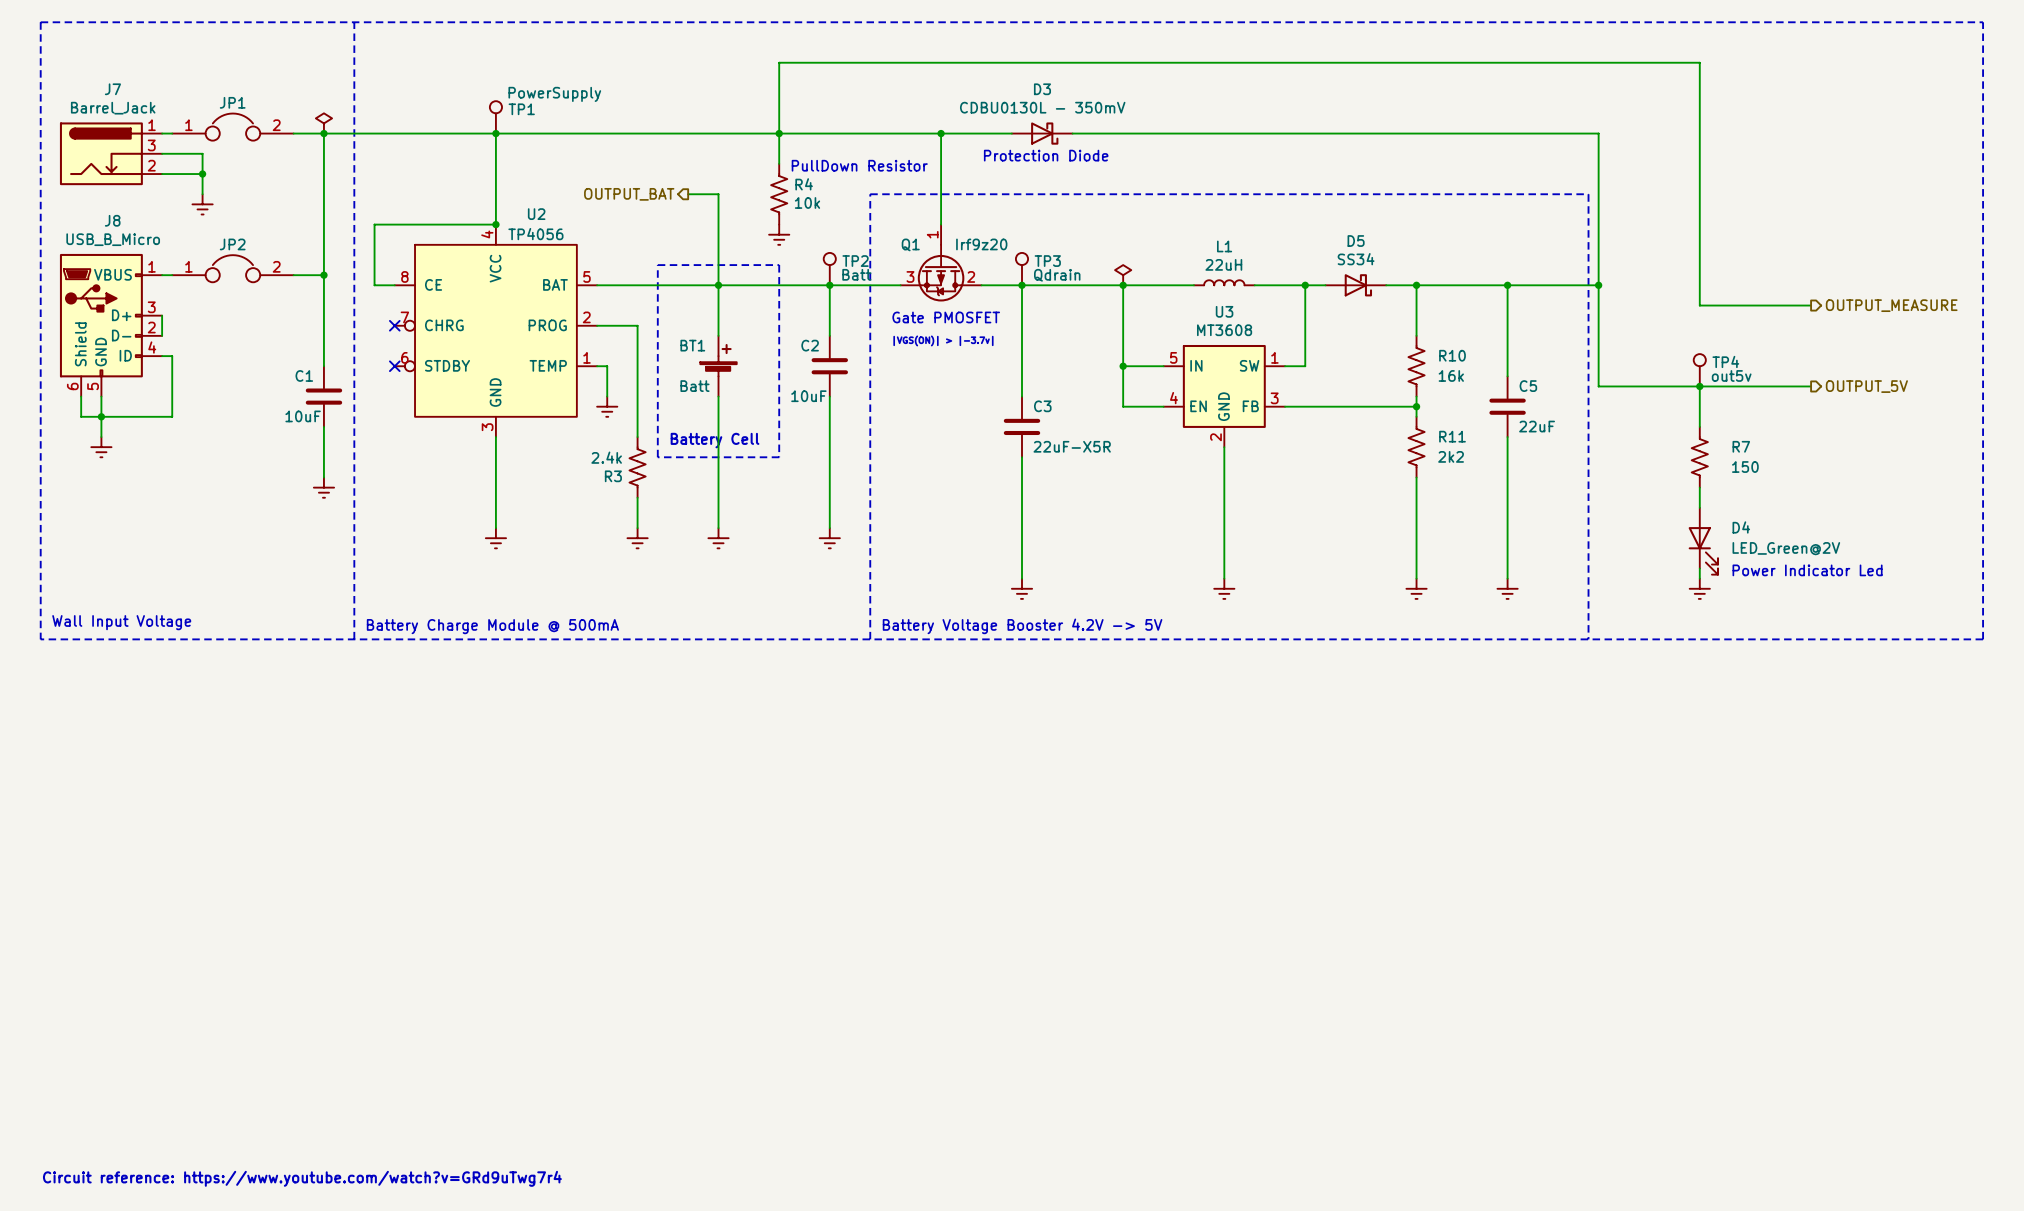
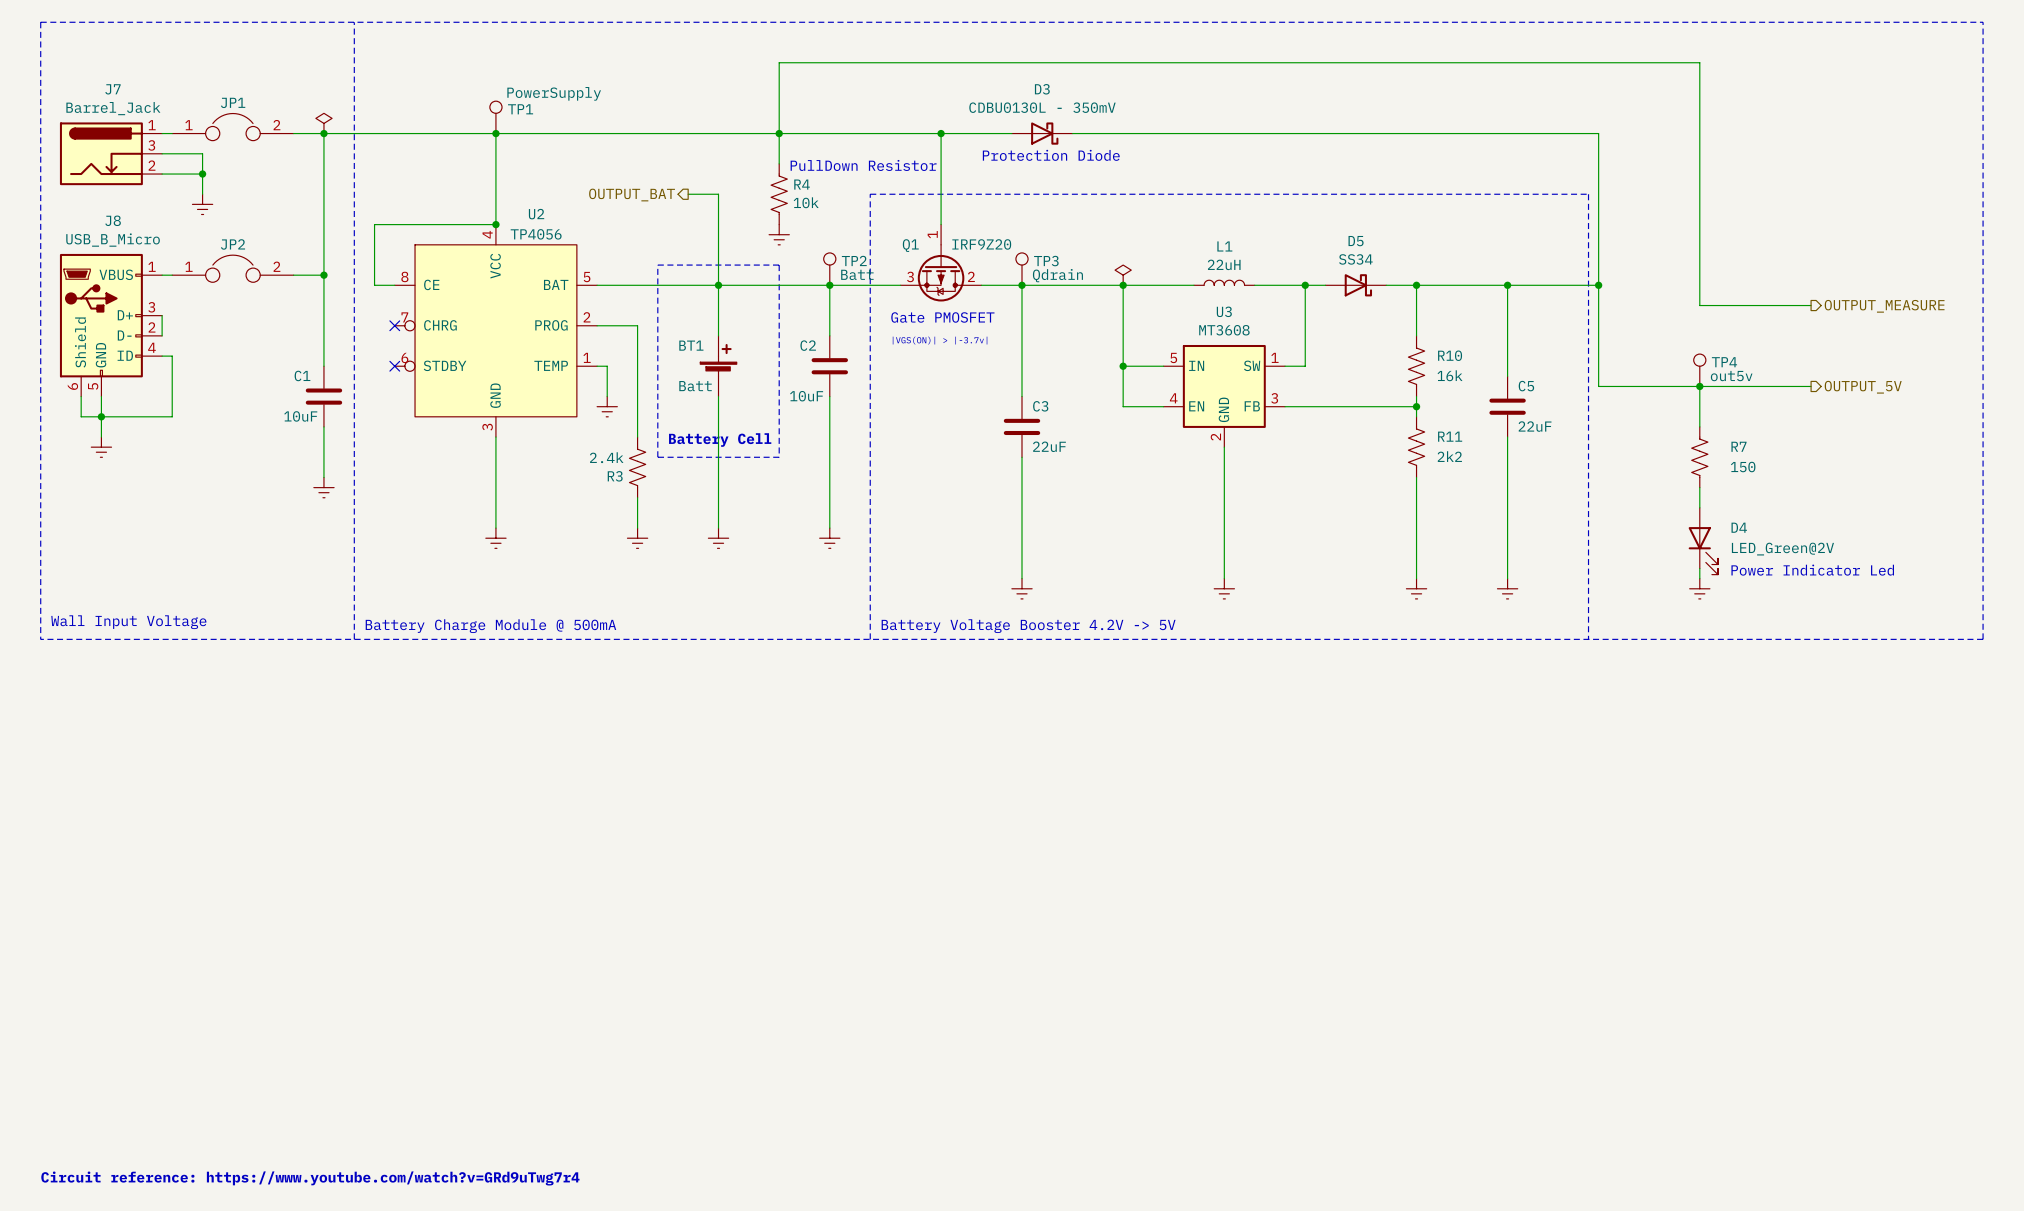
Q1 value: Irf9z20 (981, 244) -> IRF9Z20 (981, 244)
C3 value: 22uF-X5R (1072, 446) -> 22uF (1049, 446)

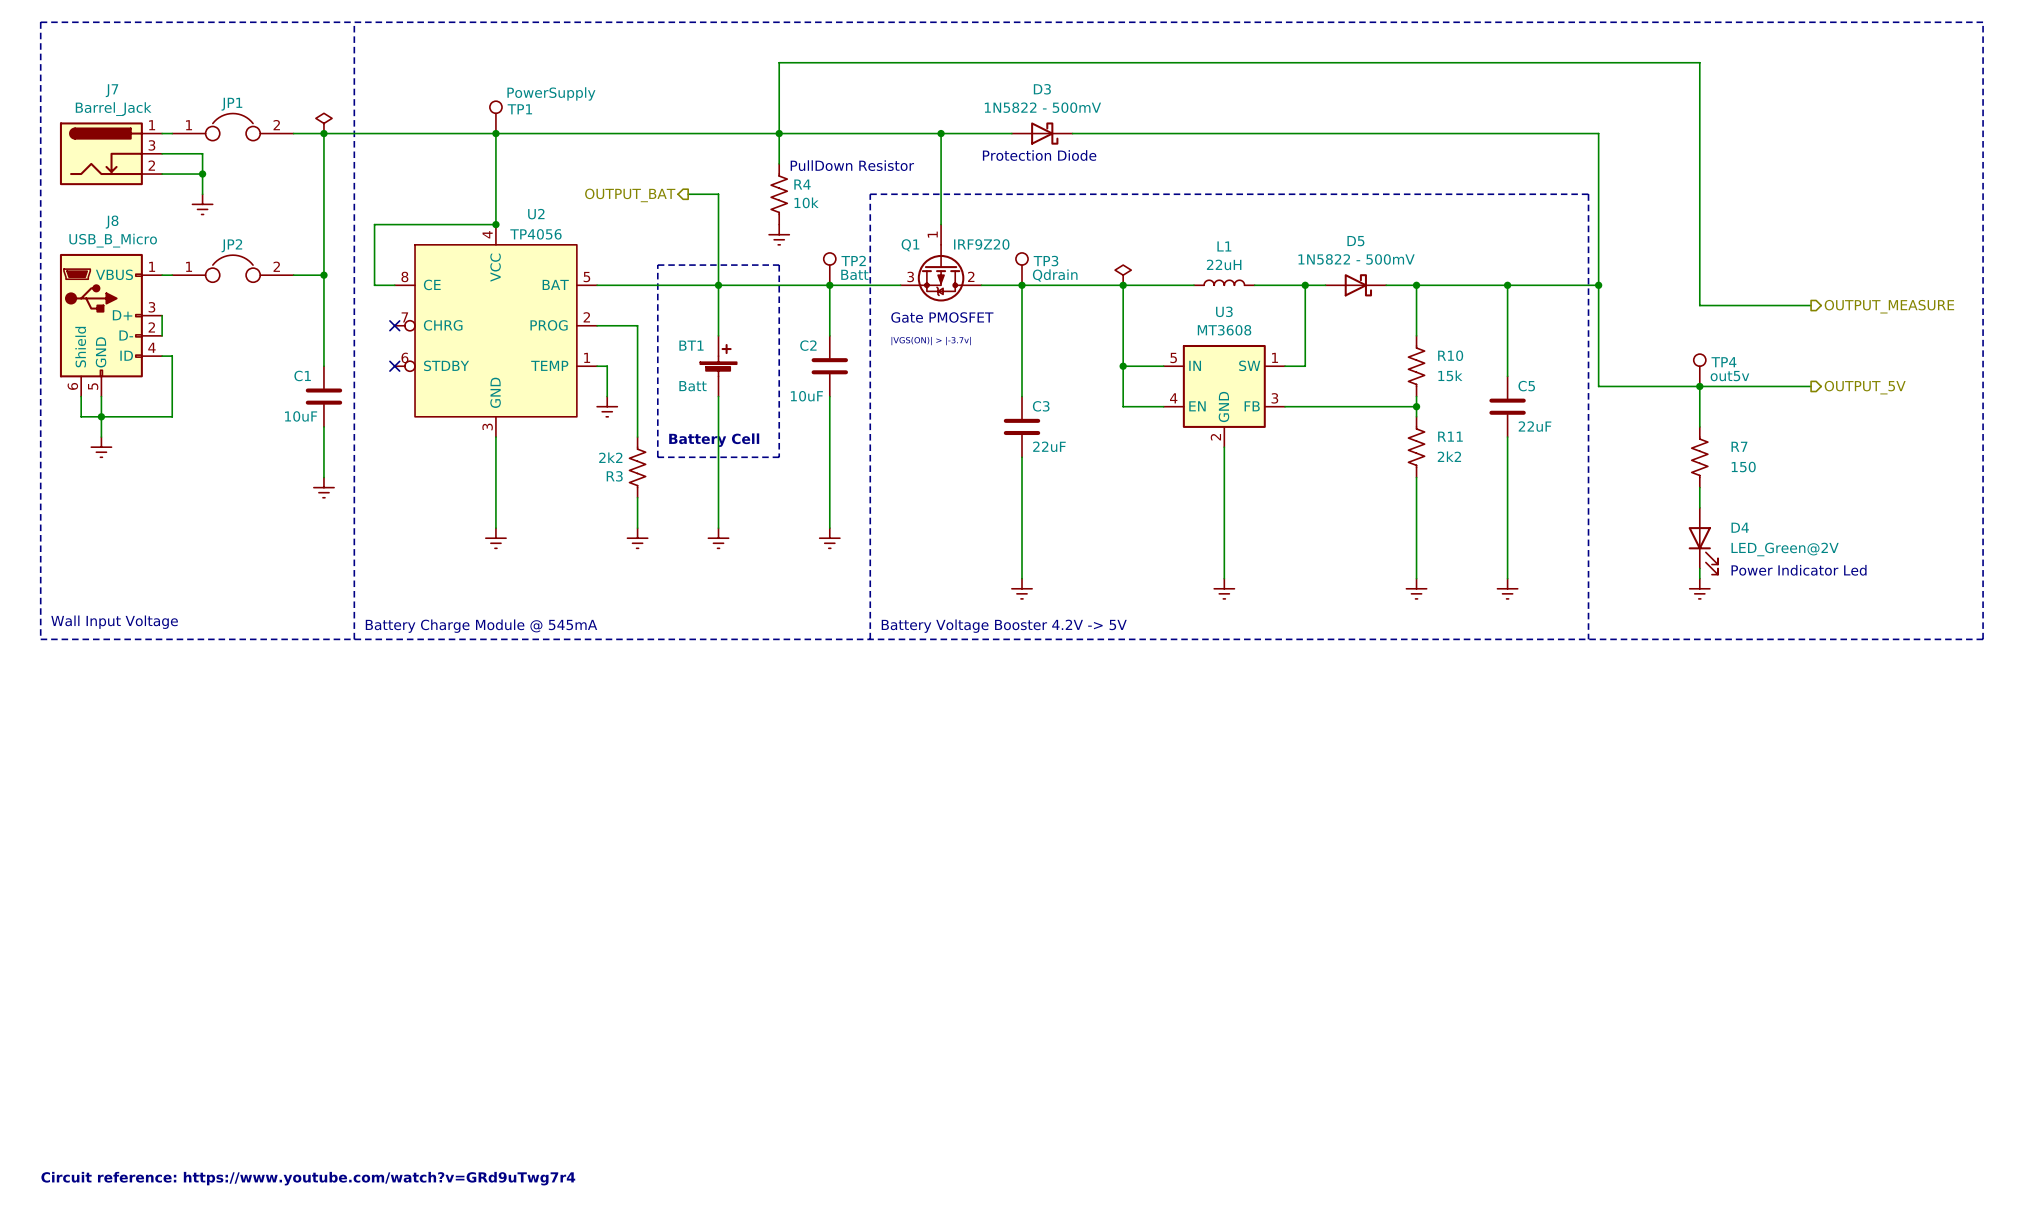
D3 value: CDBU0130L - 350mV (1042, 107) -> 1N5822 - 500mV (1042, 107)
D5 value: SS34 (1355, 259) -> 1N5822 - 500mV (1356, 259)
R10 value: 16k (1450, 375) -> 15k (1450, 375)
R3 value: 2.4k (606, 457) -> 2k2 (610, 457)
text: Battery Charge Module @ 500mA (490, 626) -> Battery Charge Module @ 545mA (481, 626)

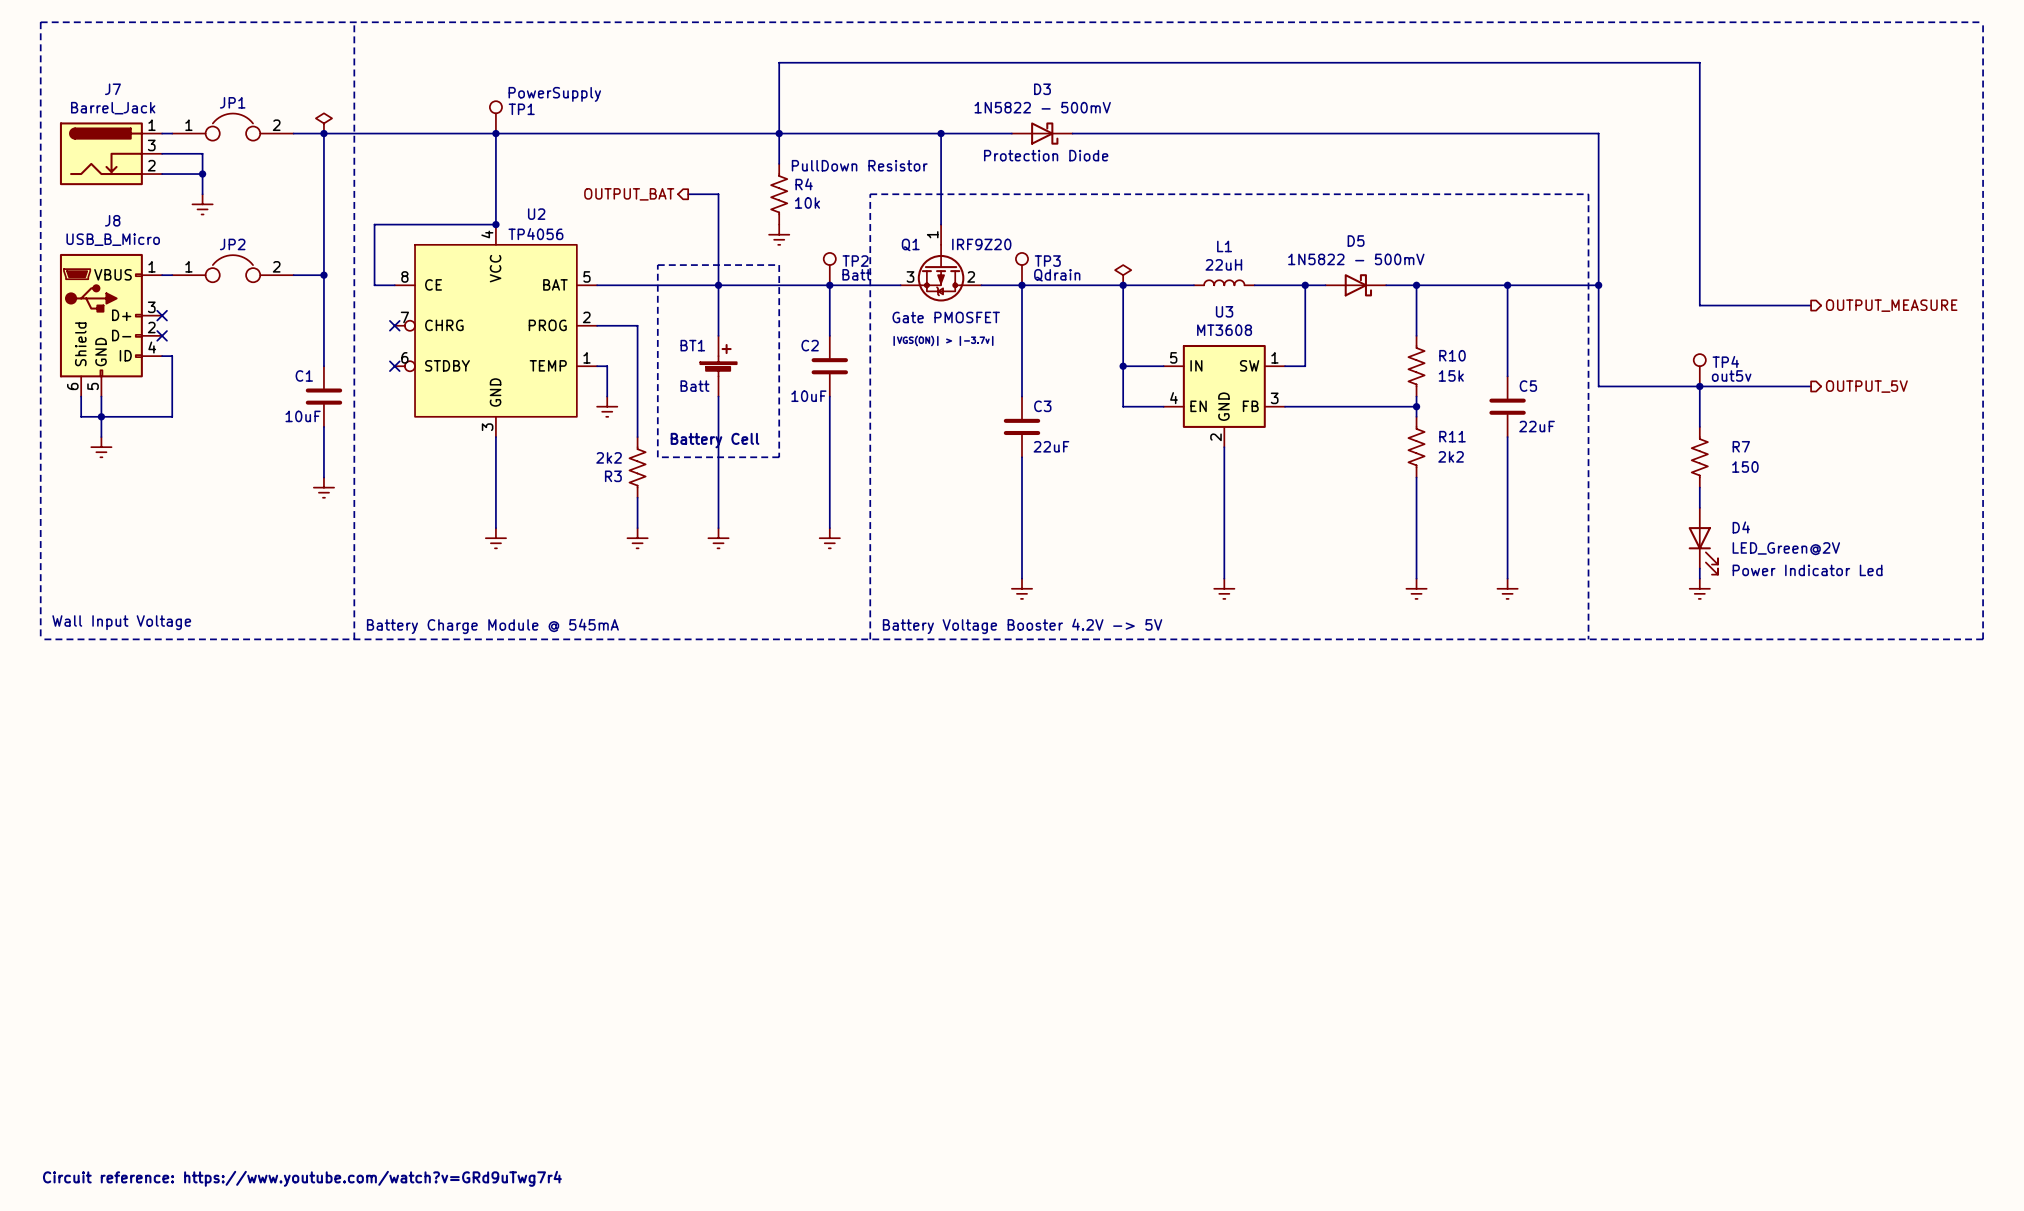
wire: (162, 315) (162, 335) -> none
no-connect mark: none -> (162, 315)
no-connect mark: none -> (162, 335)

